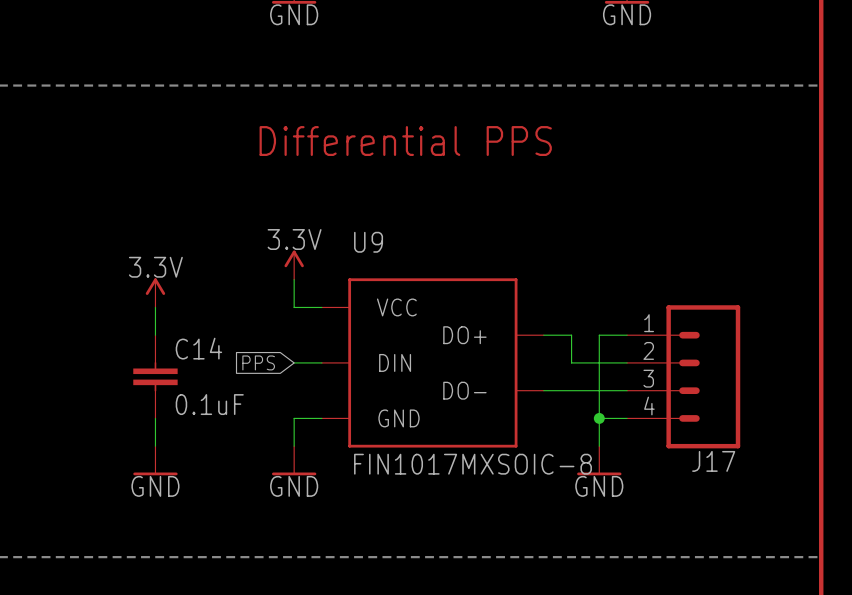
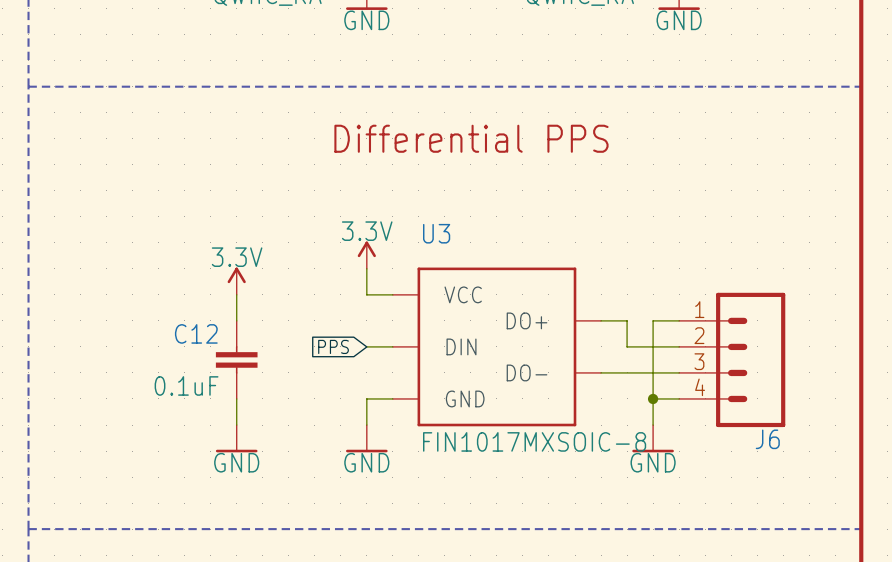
U9 name: U9 (368, 242) -> U3 (436, 233)
C14 name: C14 (198, 348) -> C12 (196, 333)
C14 value position: 0.1uF (209, 404) -> 0.1uF (186, 385)
J17 name: J17 (713, 461) -> J6 (767, 439)

